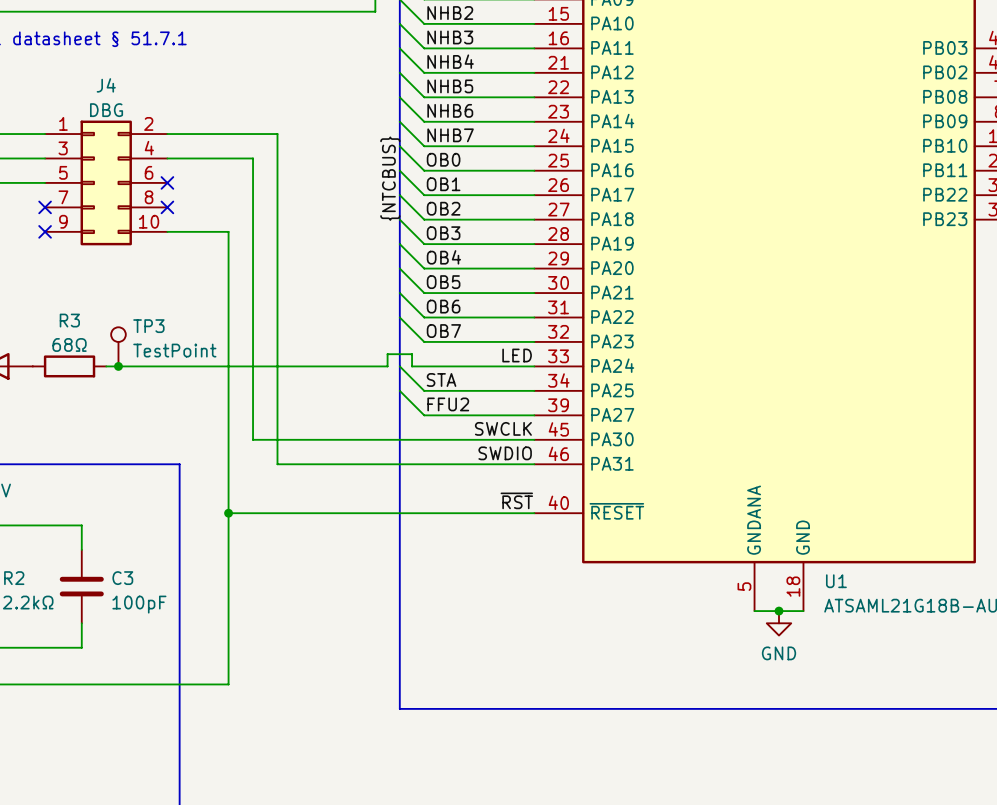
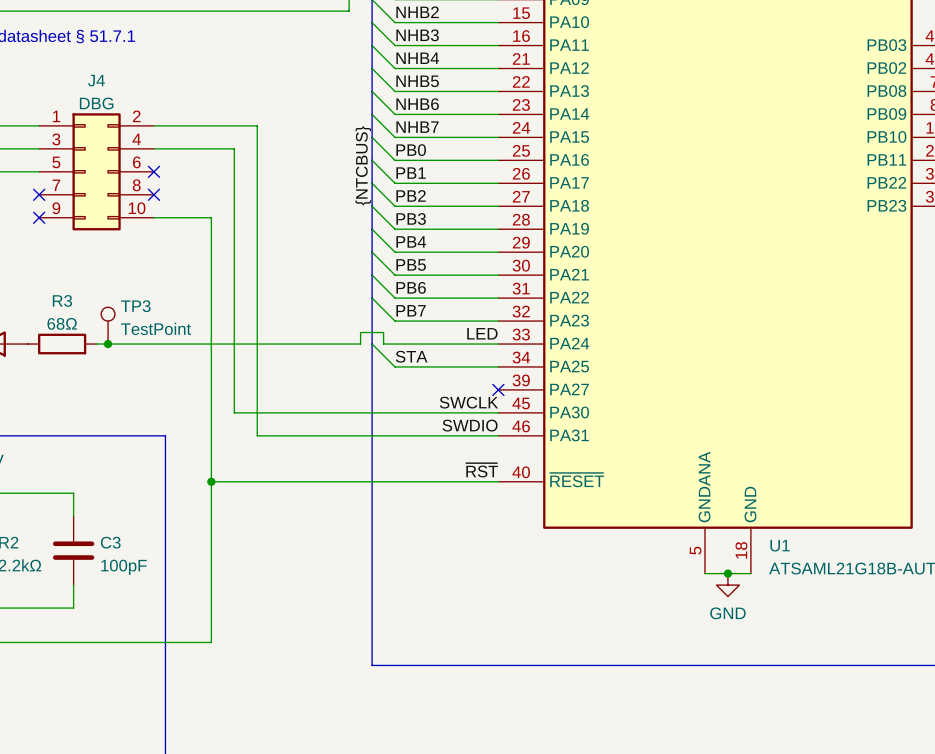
label: OB0 (443, 159) -> PB0 (411, 150)
label: OB1 (443, 184) -> PB1 (411, 173)
label: OB2 (443, 208) -> PB2 (411, 195)
label: OB3 (443, 233) -> PB3 (411, 218)
label: OB4 (443, 257) -> PB4 (411, 241)
label: OB5 (443, 282) -> PB5 (411, 264)
label: OB6 (443, 306) -> PB6 (411, 287)
label: OB7 (443, 331) -> PB7 (411, 310)
wire: (399, 390) (424, 415) (534, 415) -> none
label: FFU2 (448, 404) -> none
no-connect mark: none -> (498, 389)

